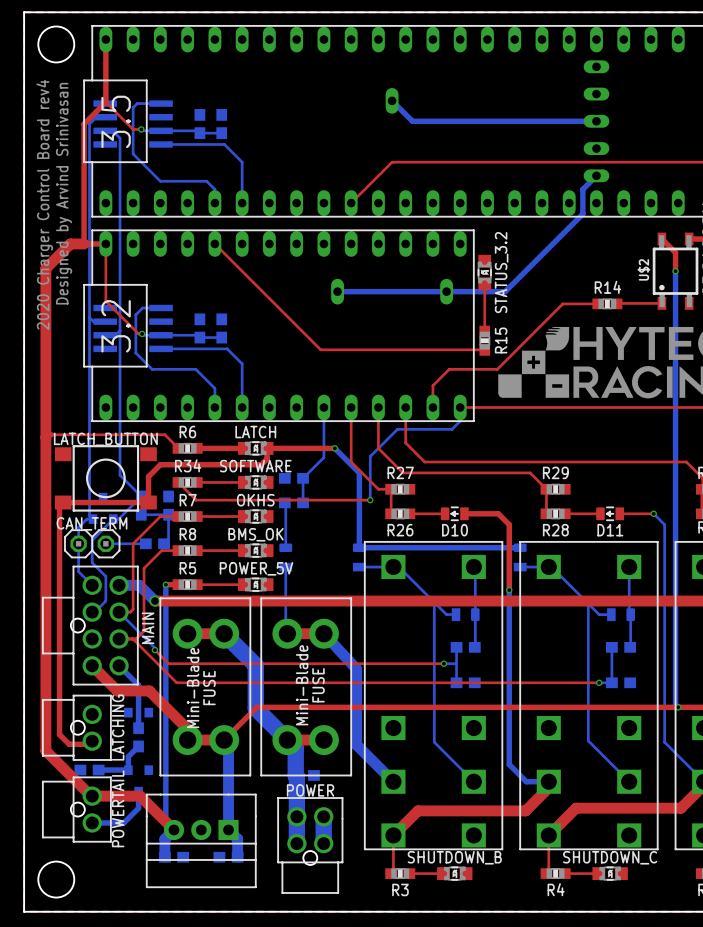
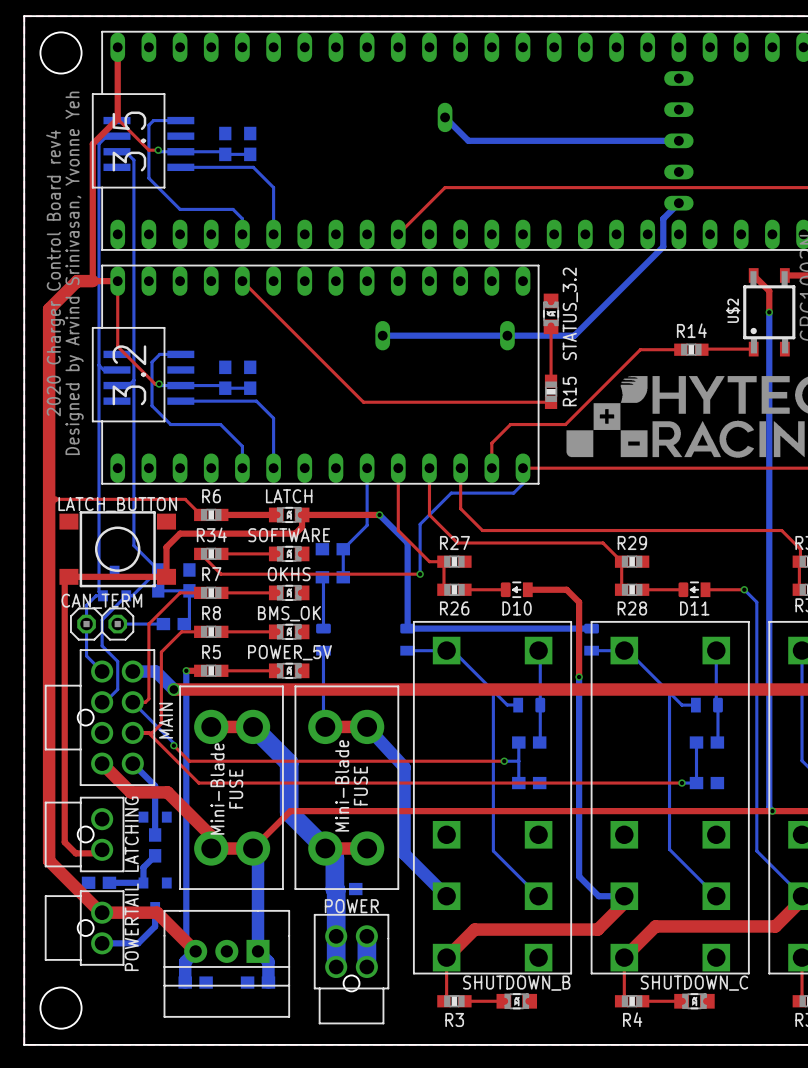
text: Designed by Arvind Srinivasan (64, 193) -> Designed by Arvind Srinivasan, Yvonne Yeh (74, 273)
text position: 2020 Charger Control Board rev4 (44, 204) -> 2020 Charger Control Board rev4 (55, 273)

